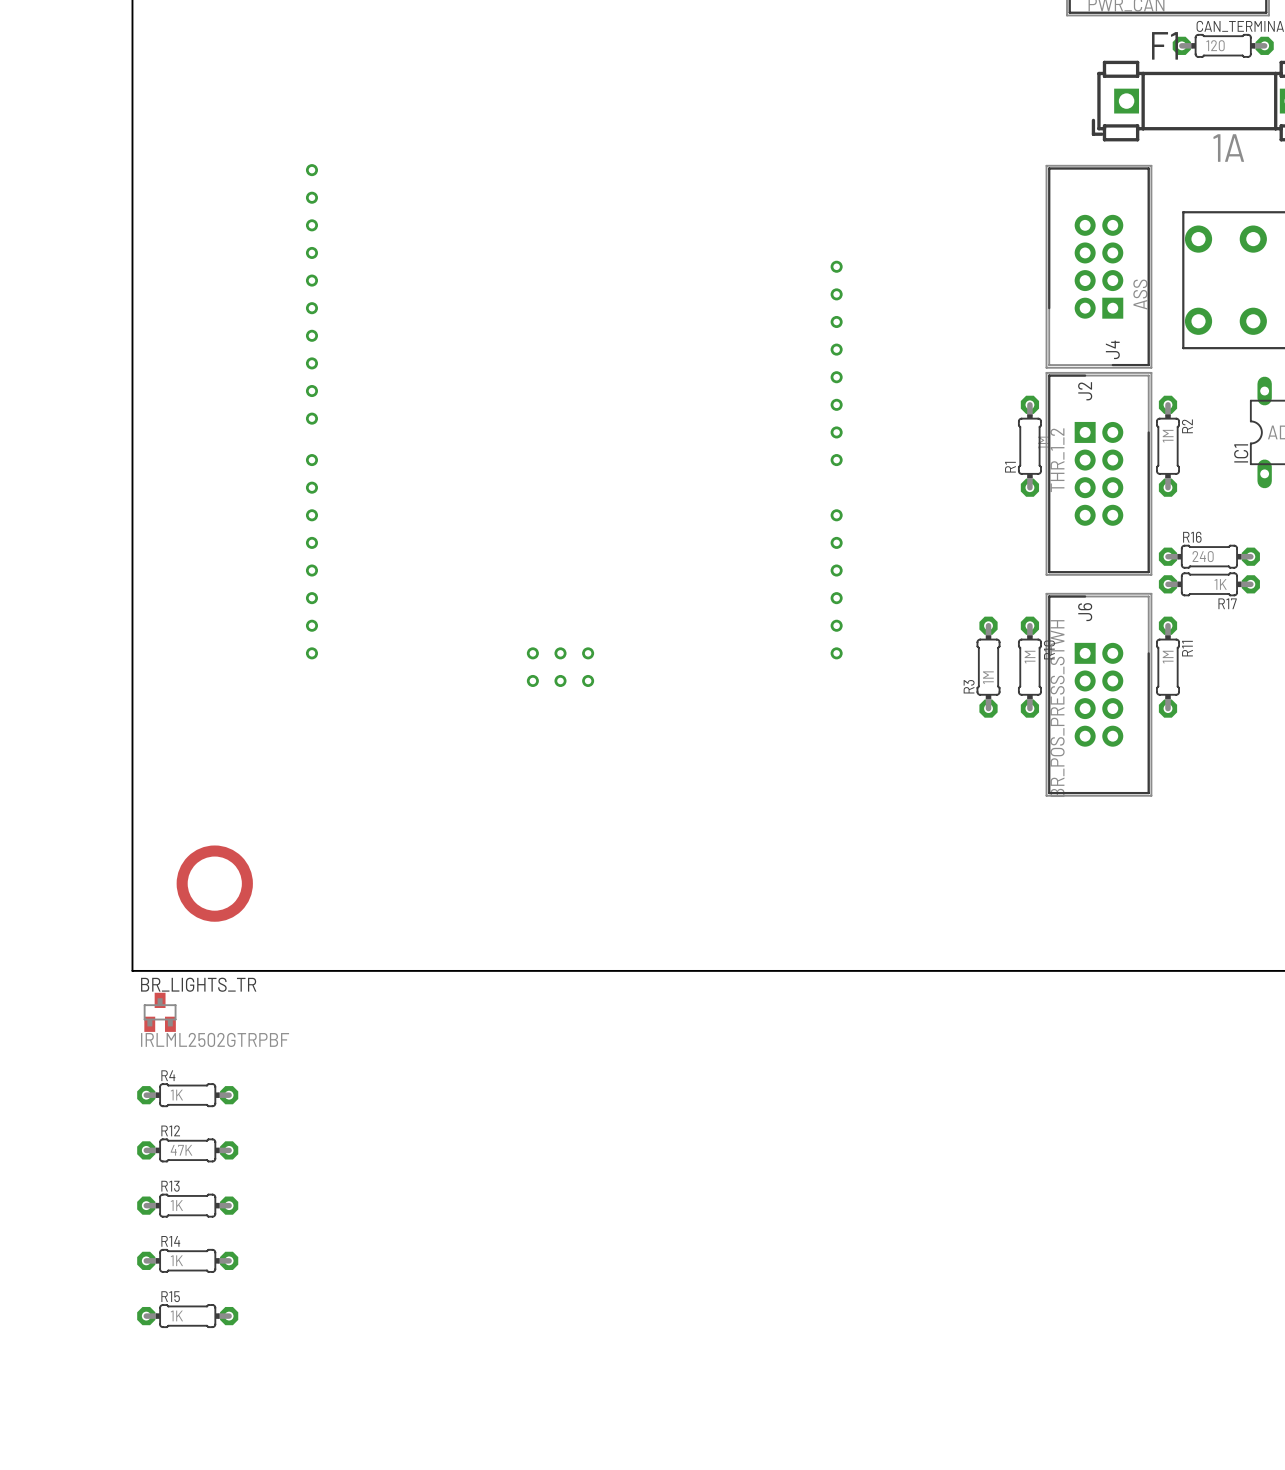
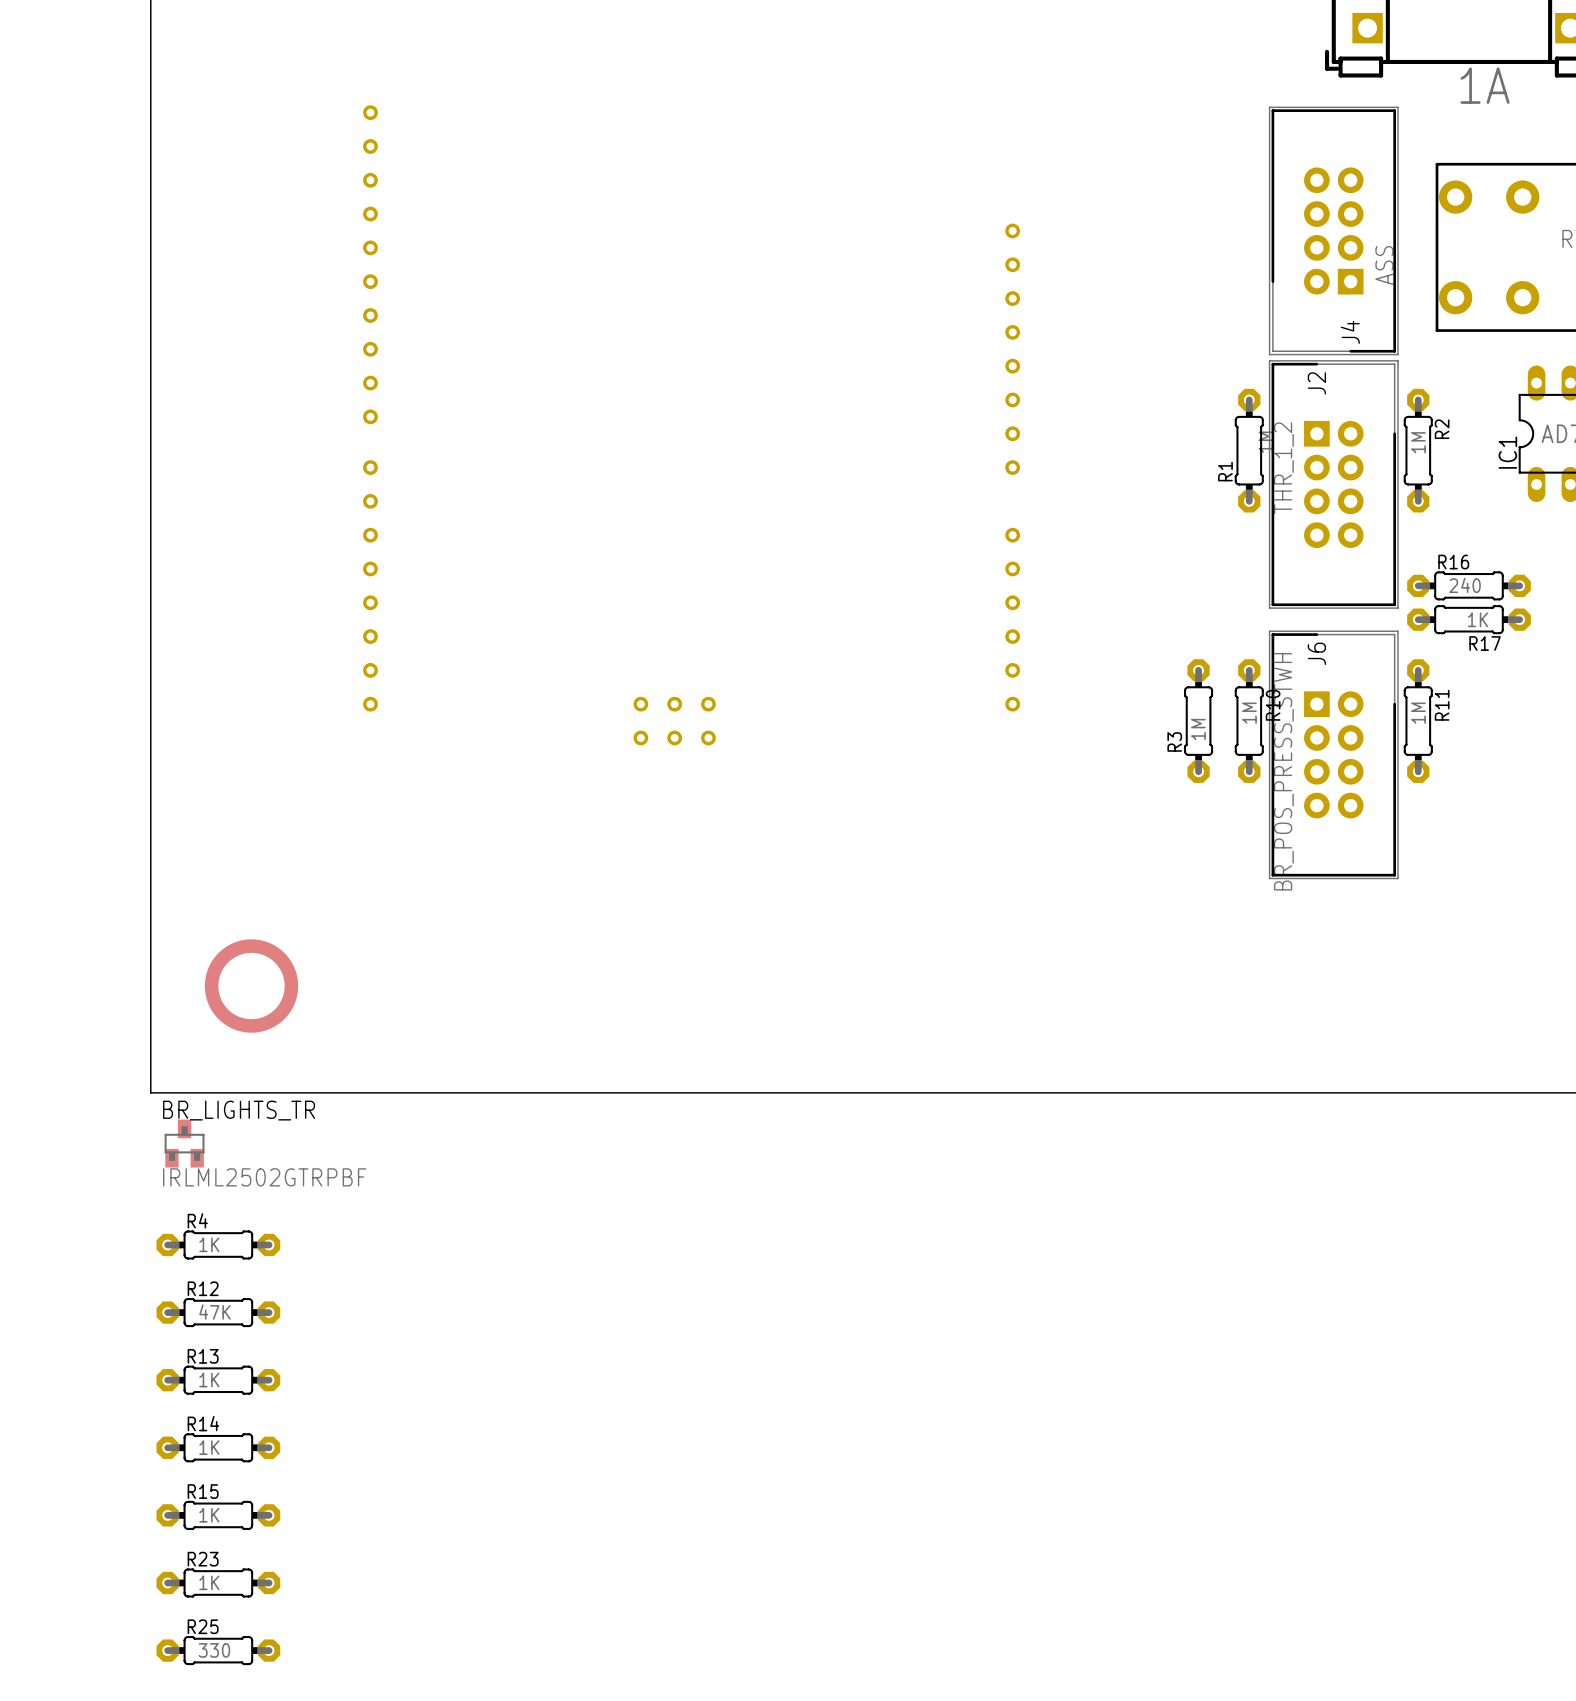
R23: none -> 1K (218, 1582)
R25: none -> 330 (218, 1650)

